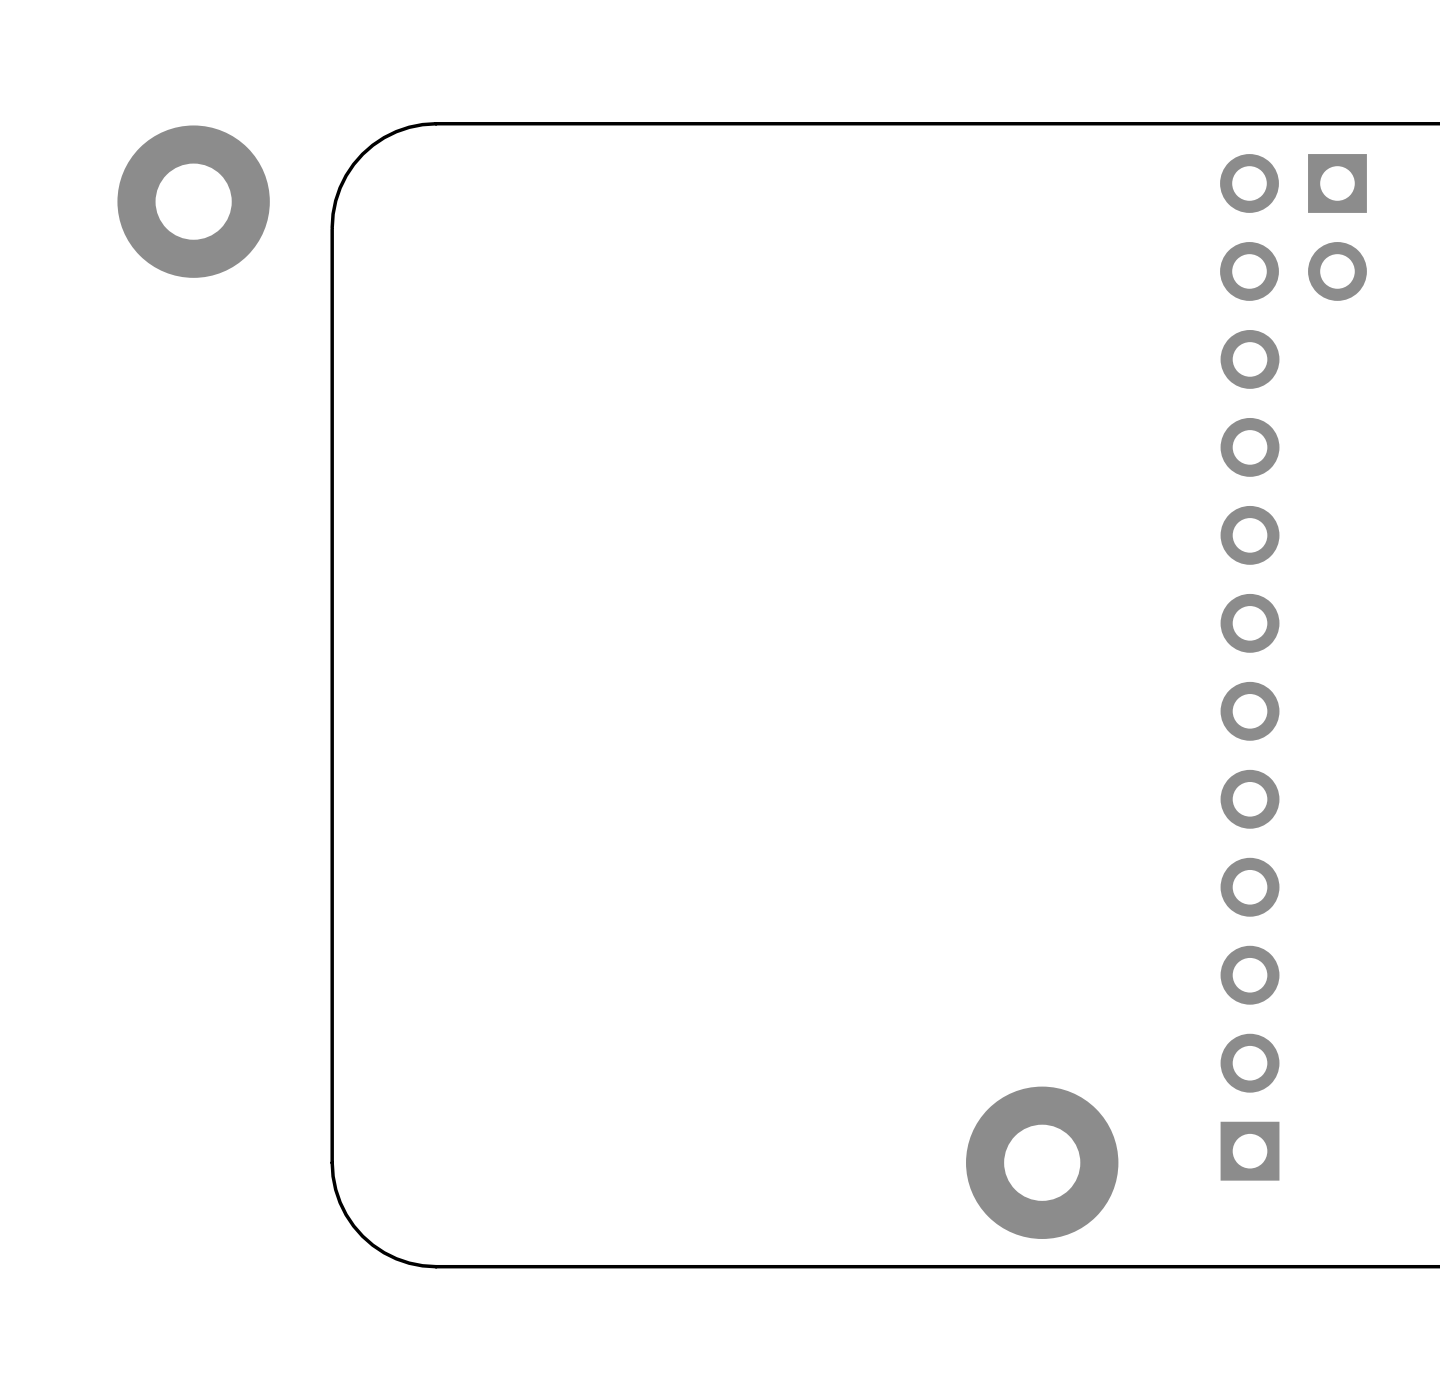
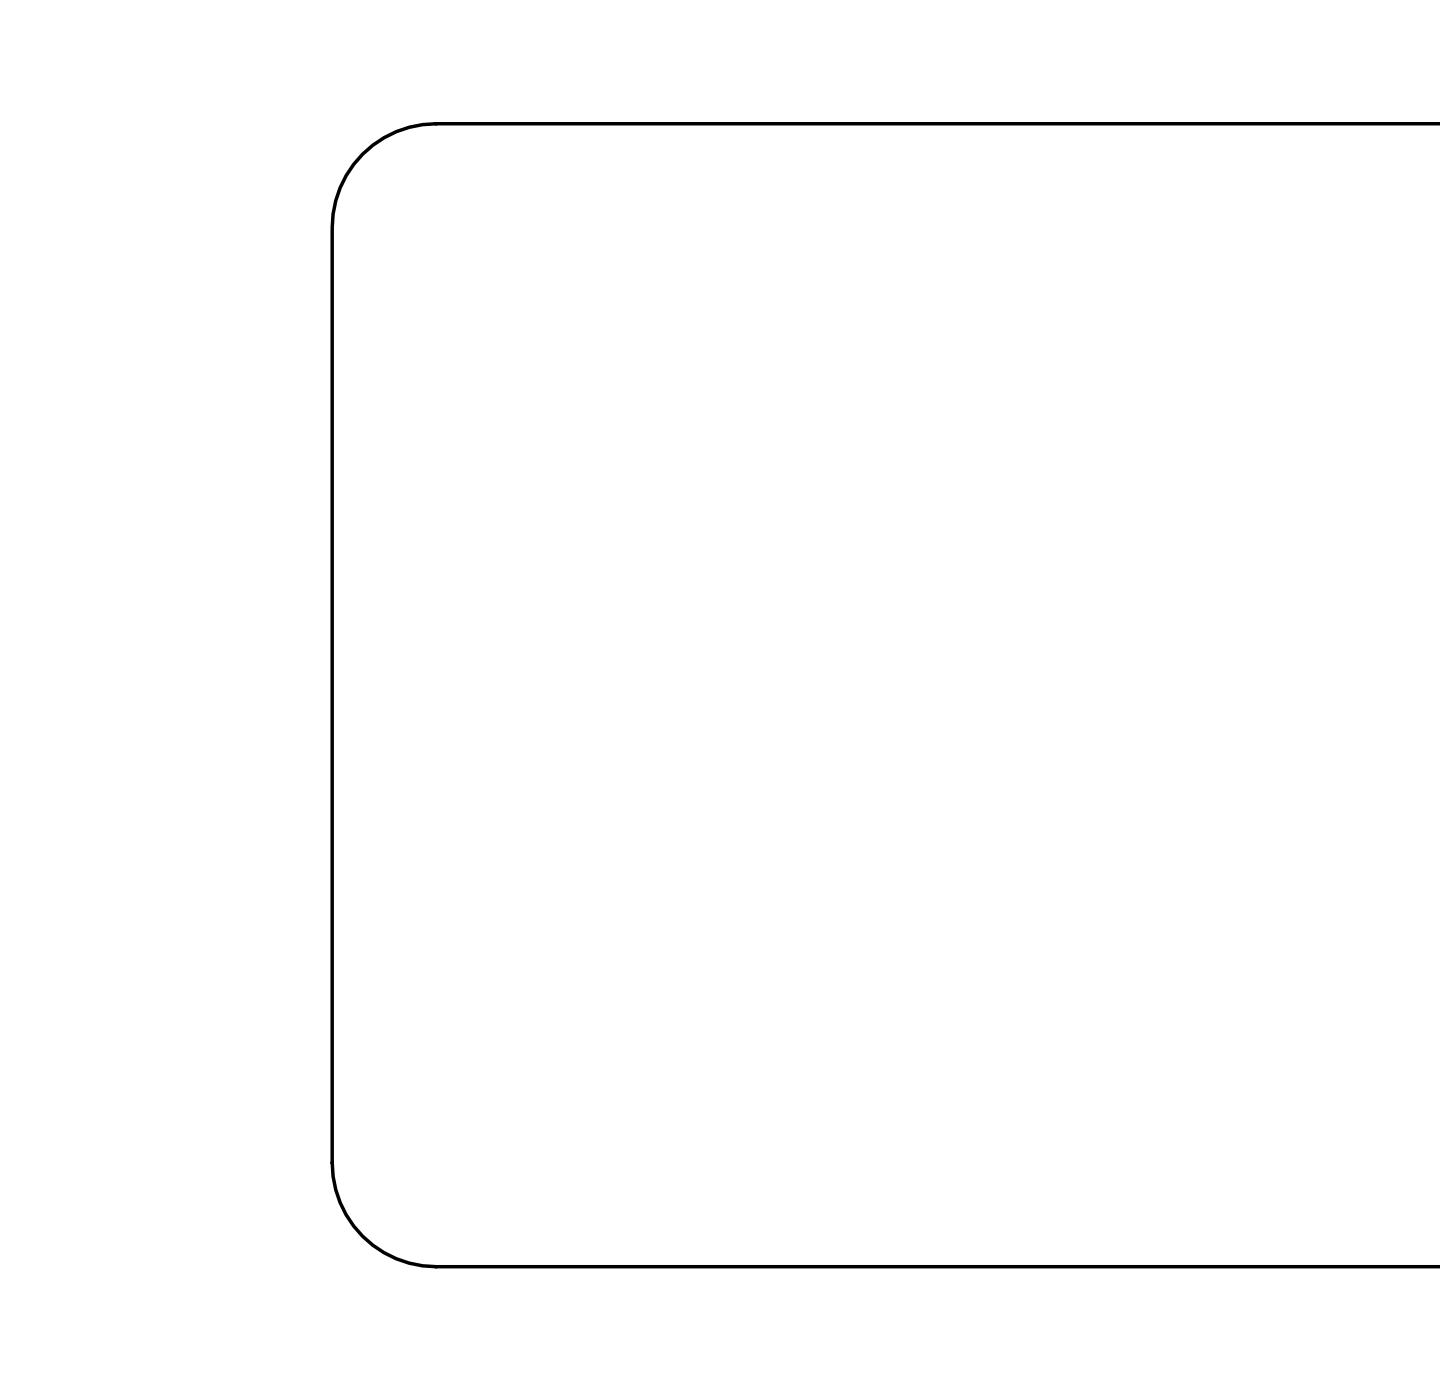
part: (193, 201) -> none
part: (1293, 227) -> none
part: (1250, 755) -> none
part: (1042, 1162) -> none

